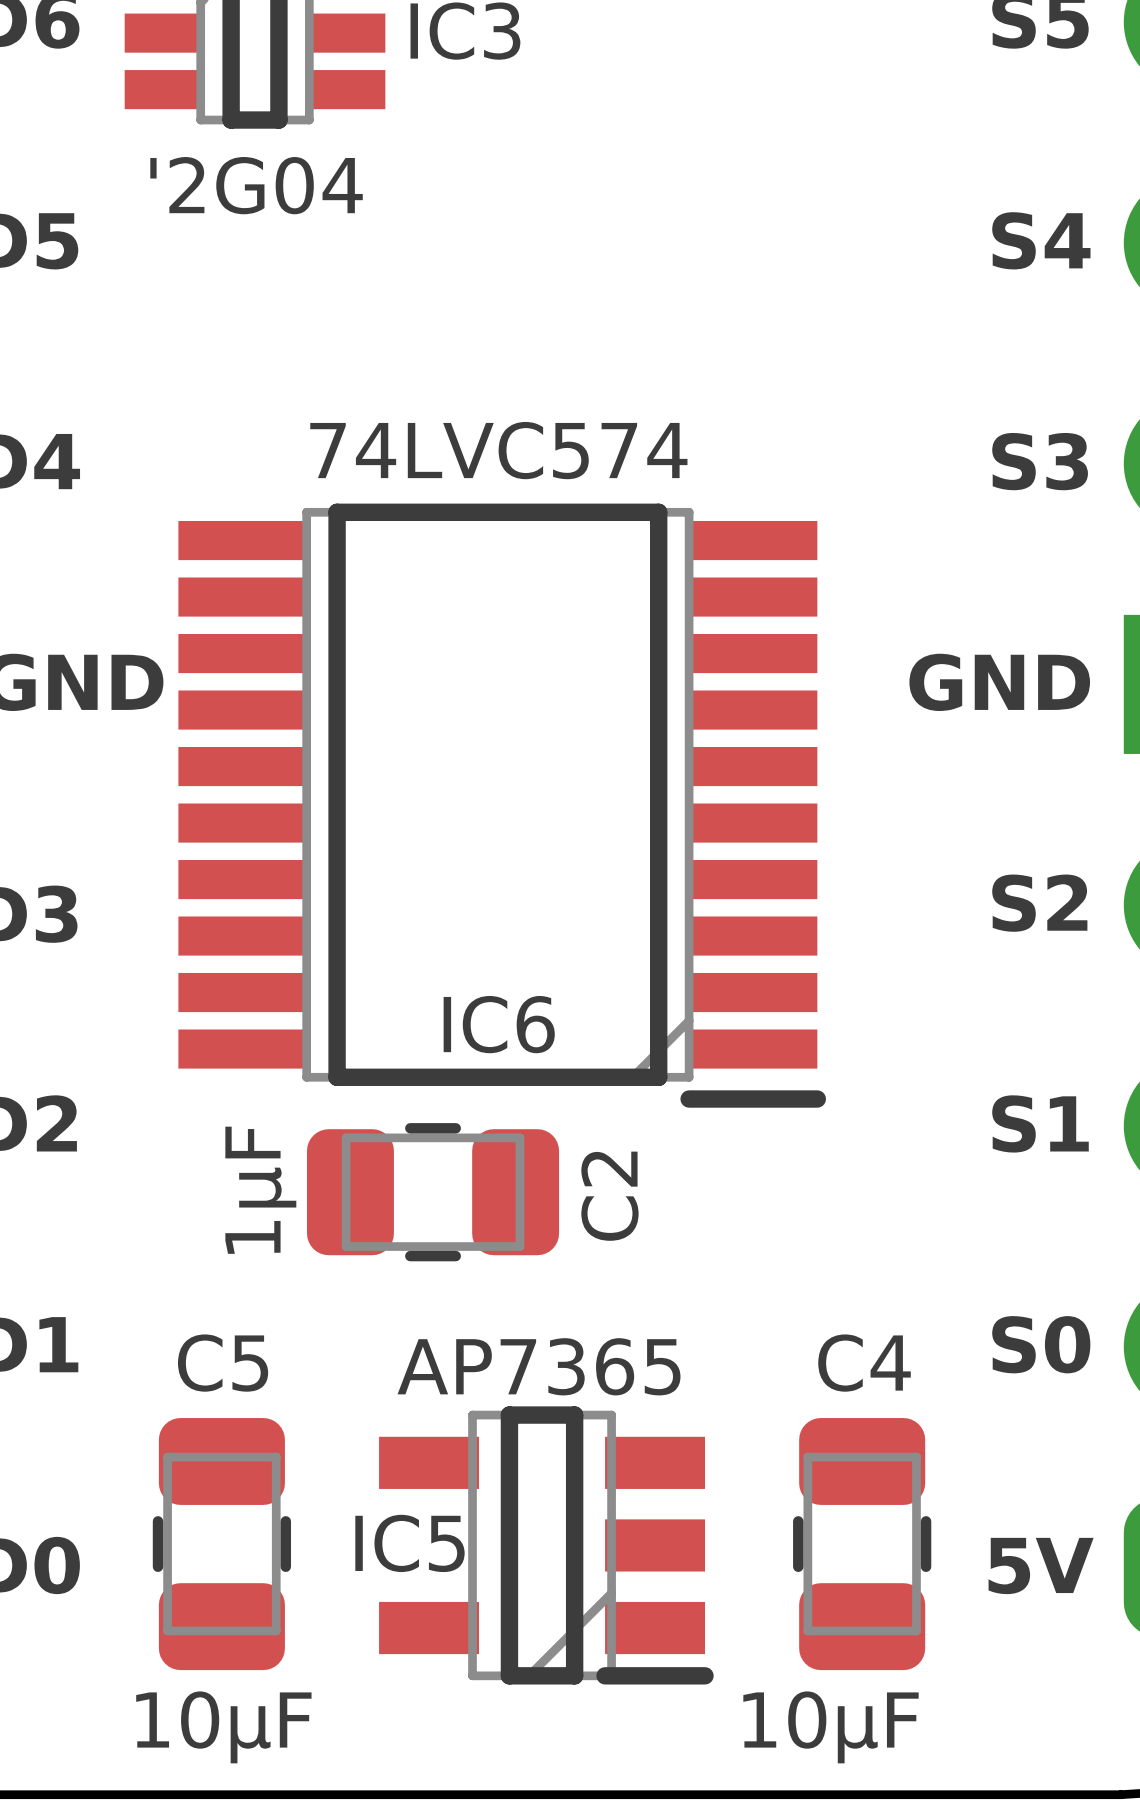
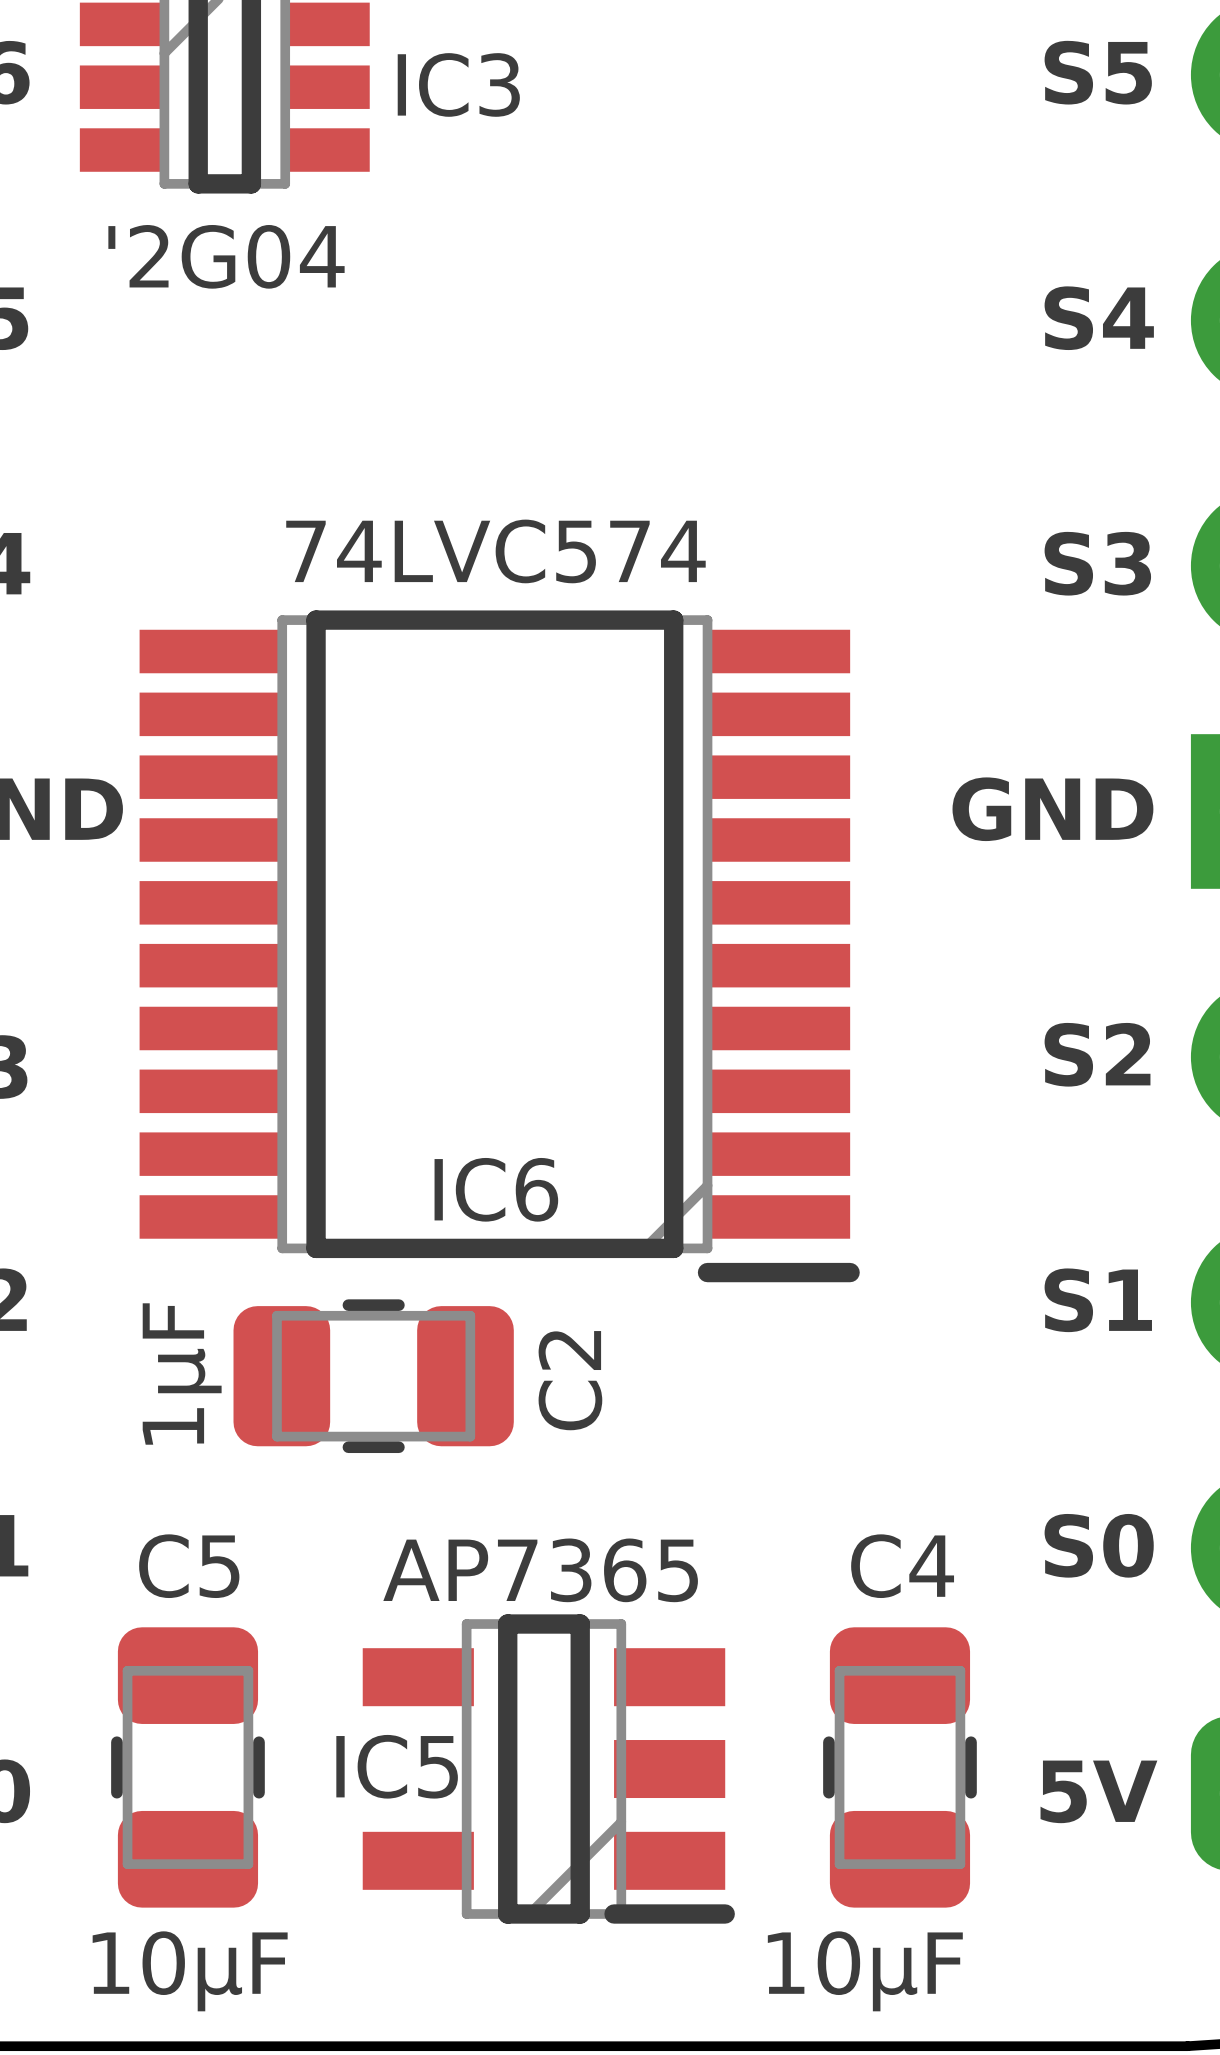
C2 position: (433, 1192) -> (373, 1376)

